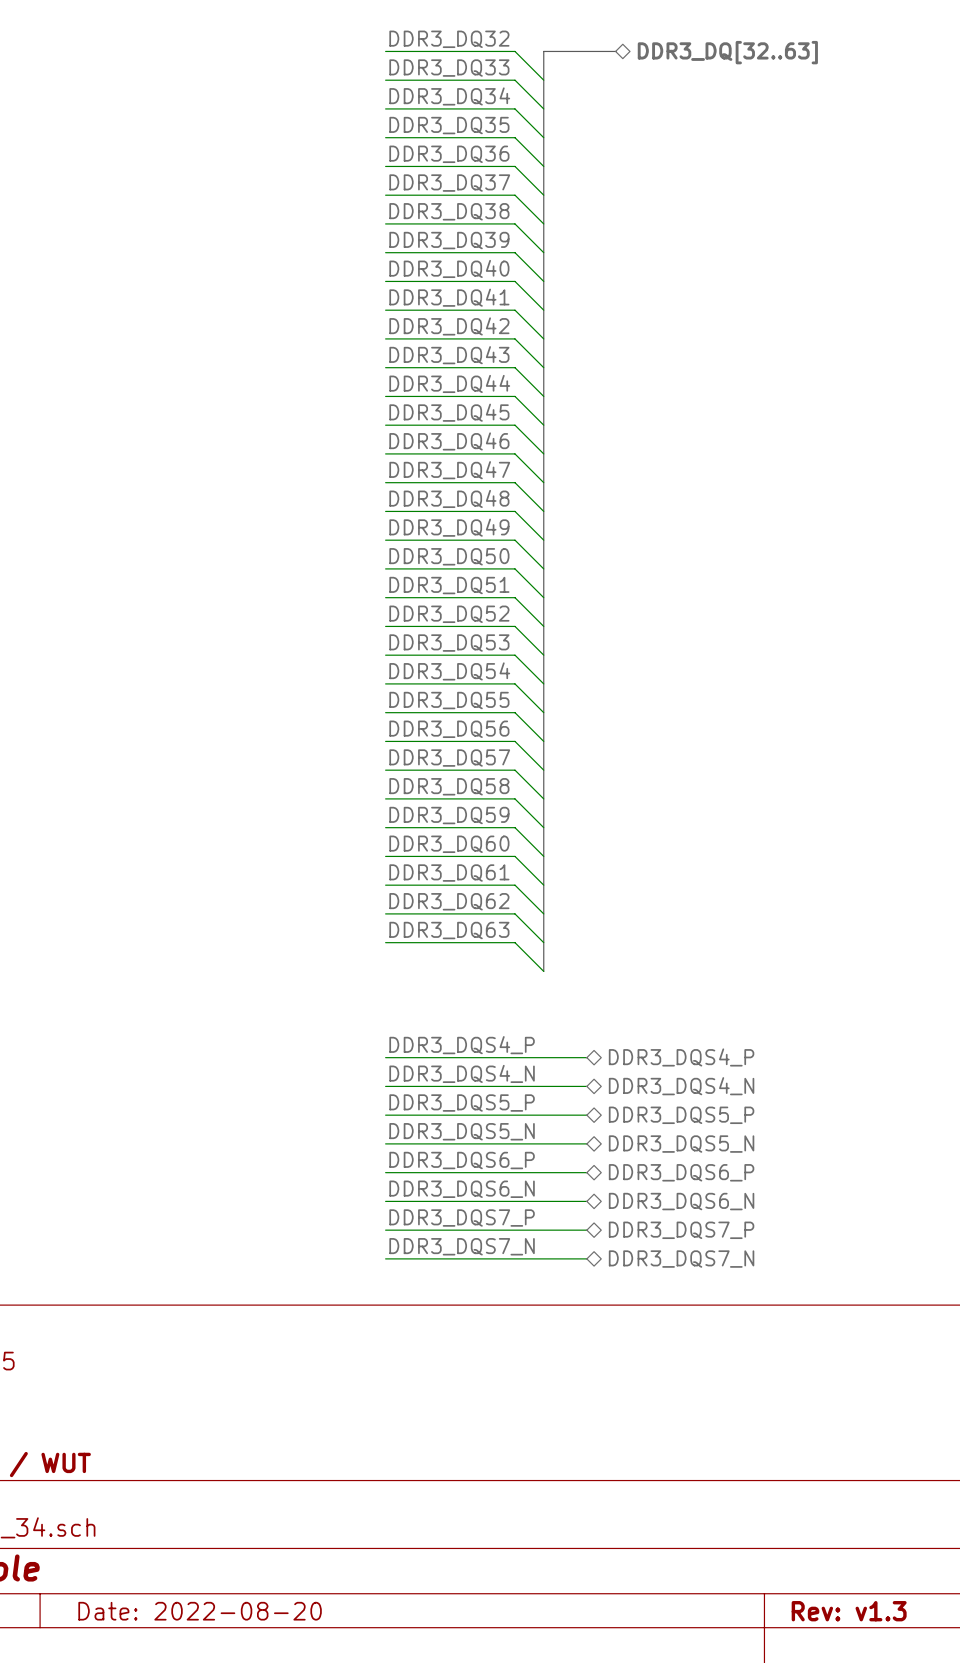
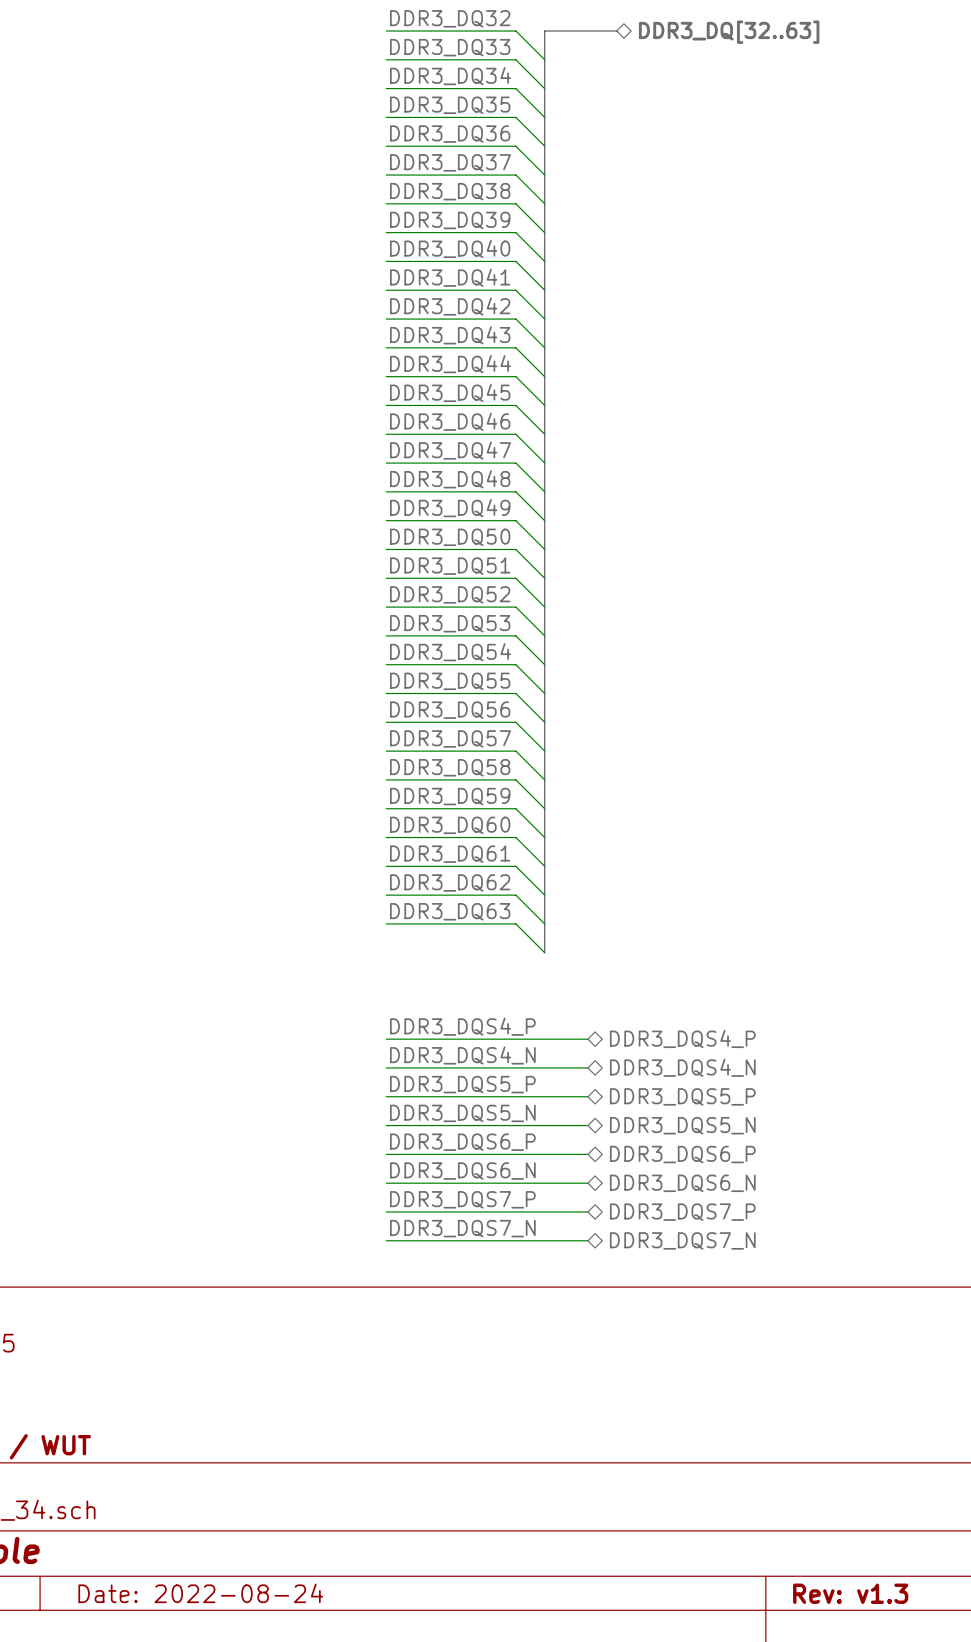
title block: Date: 2022-08-20 (200, 1611) -> Date: 2022-08-24 (200, 1593)

